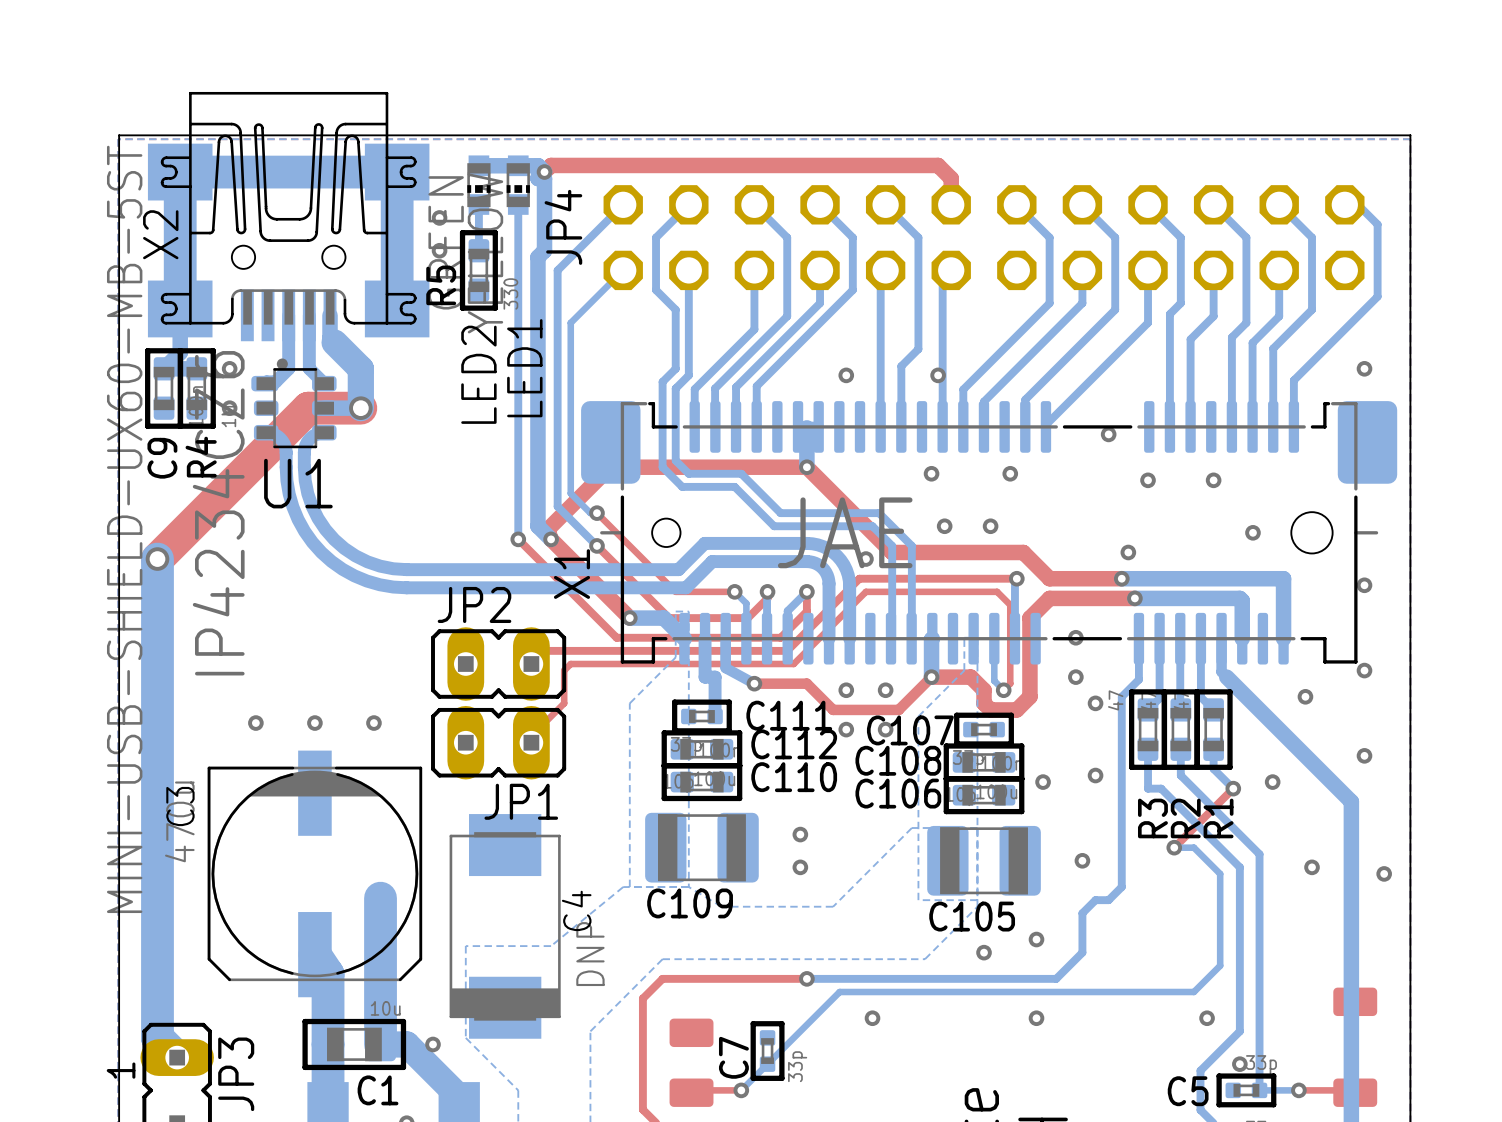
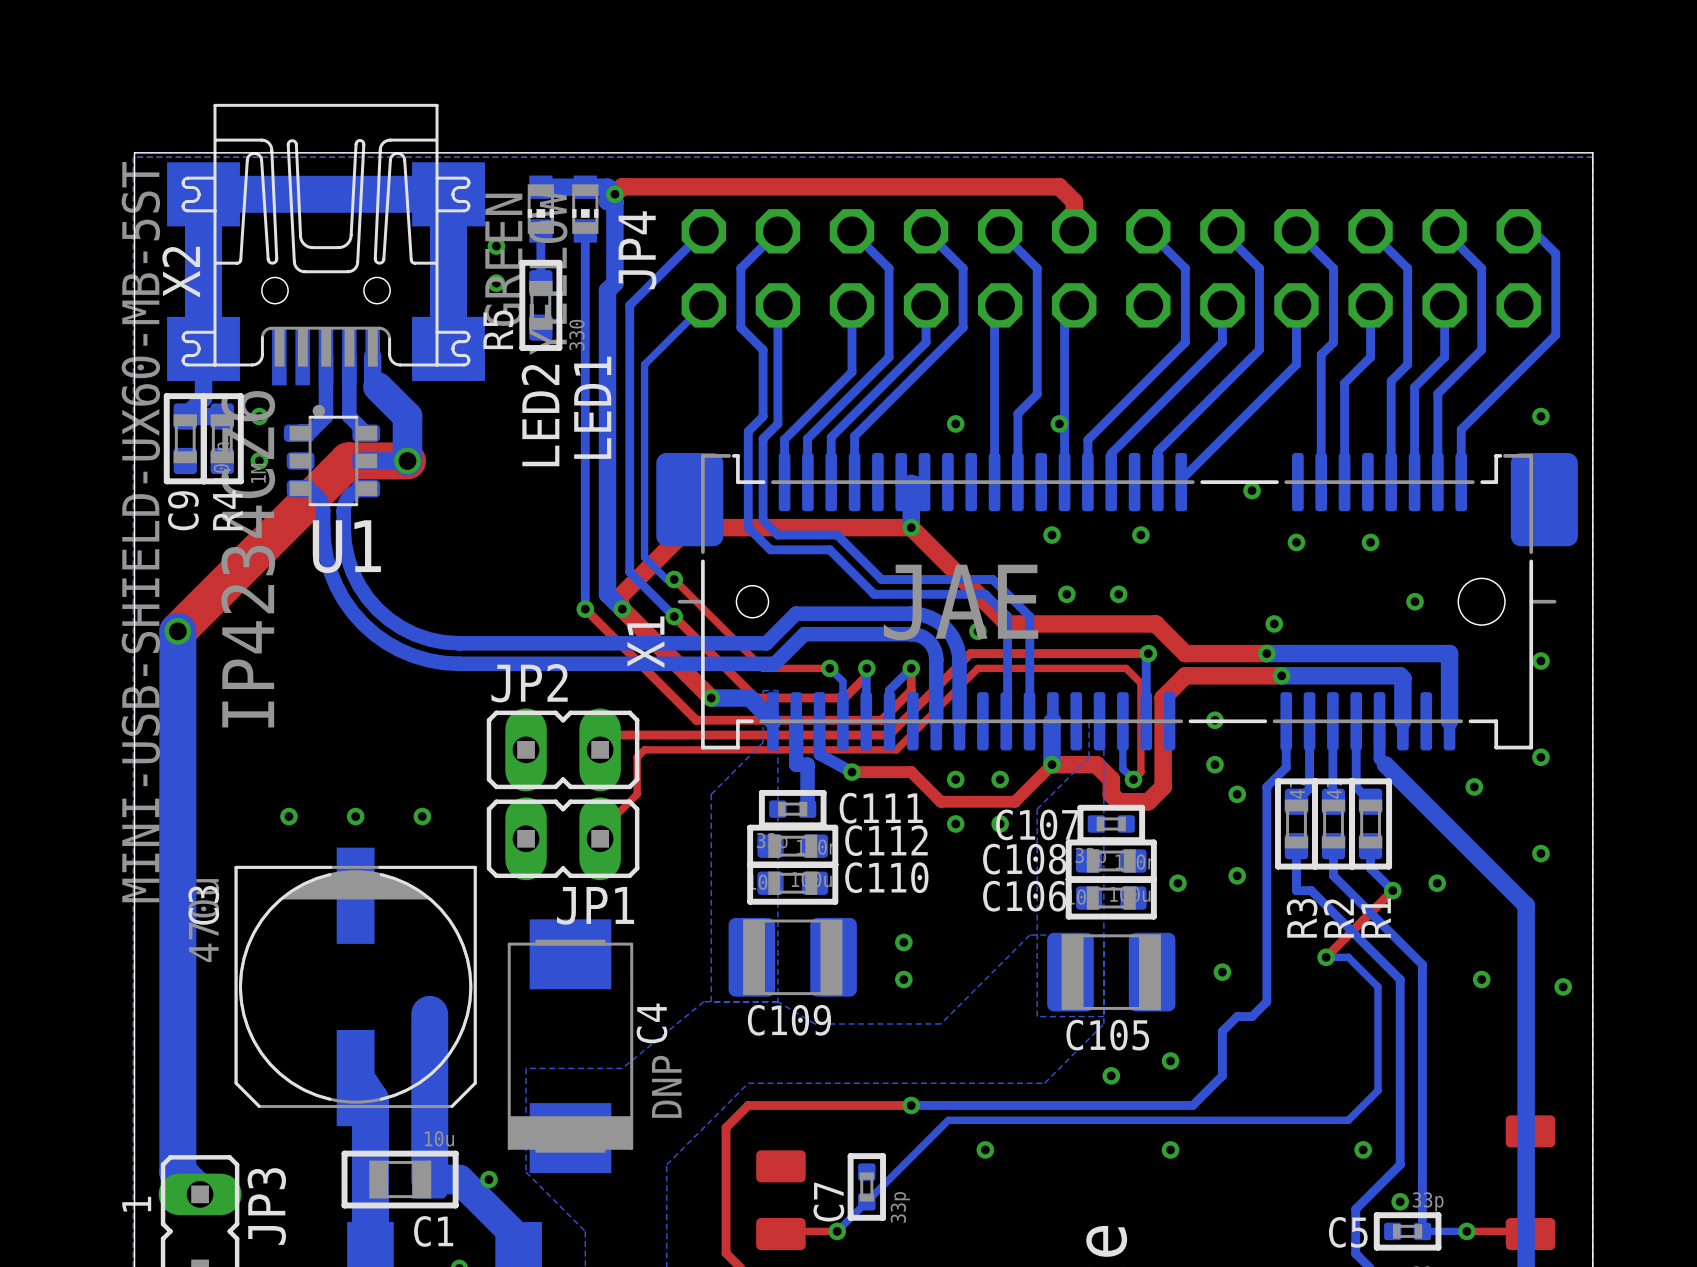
R3 value: 47 (1115, 700) -> none

